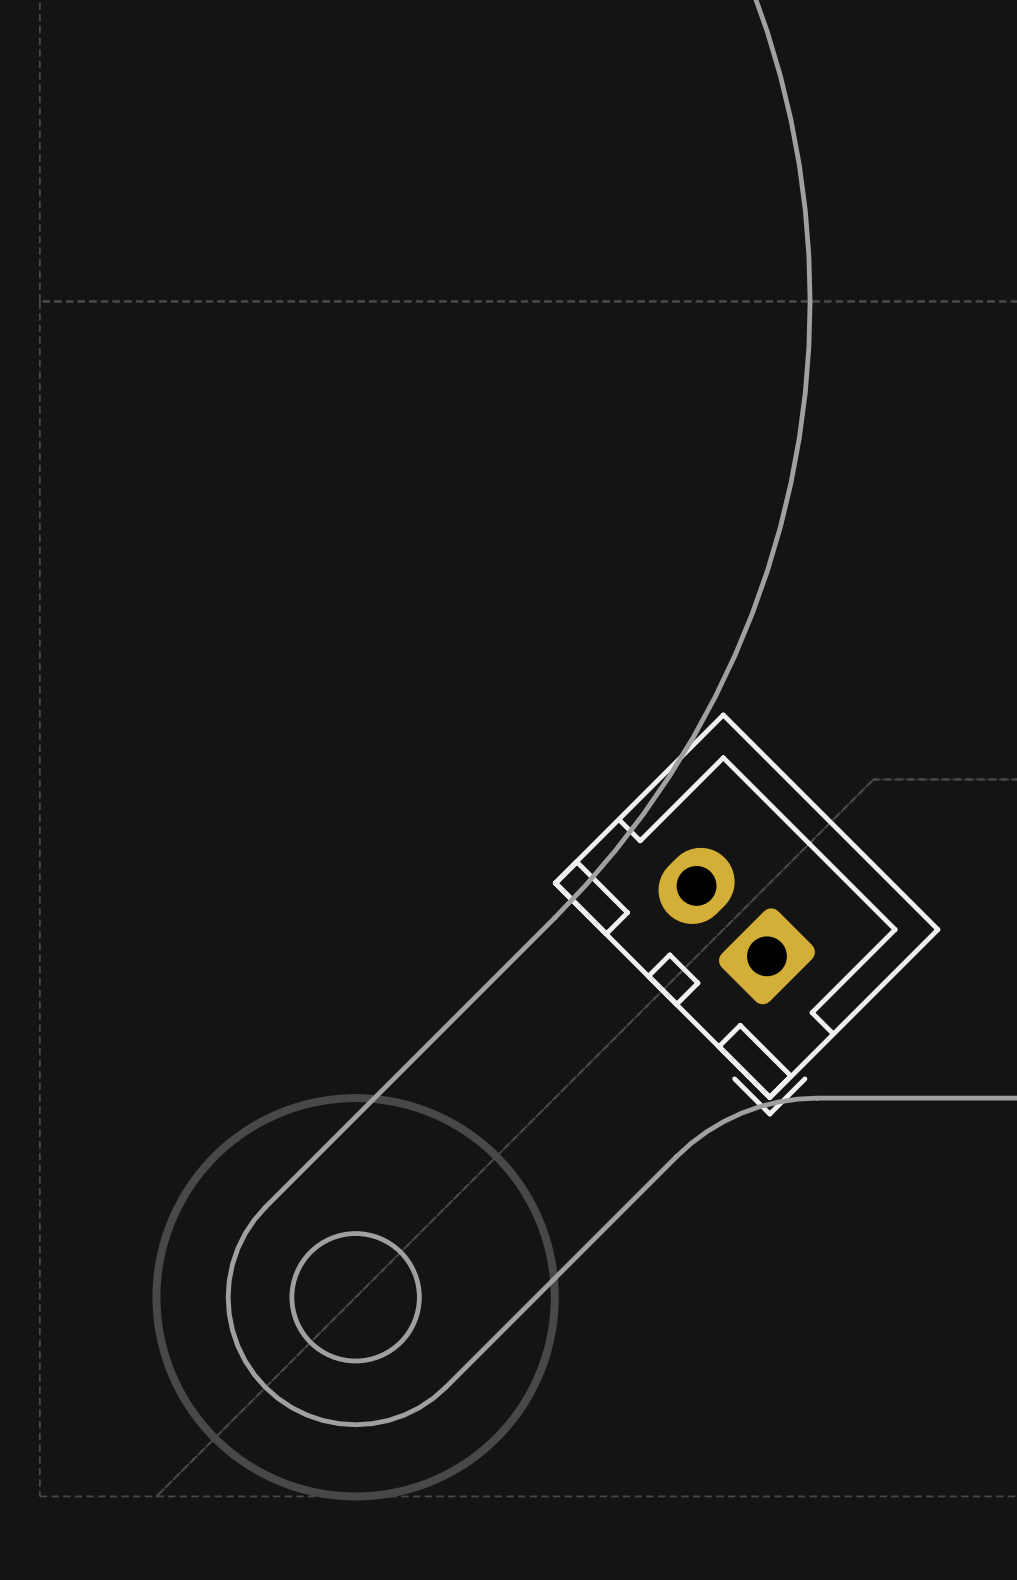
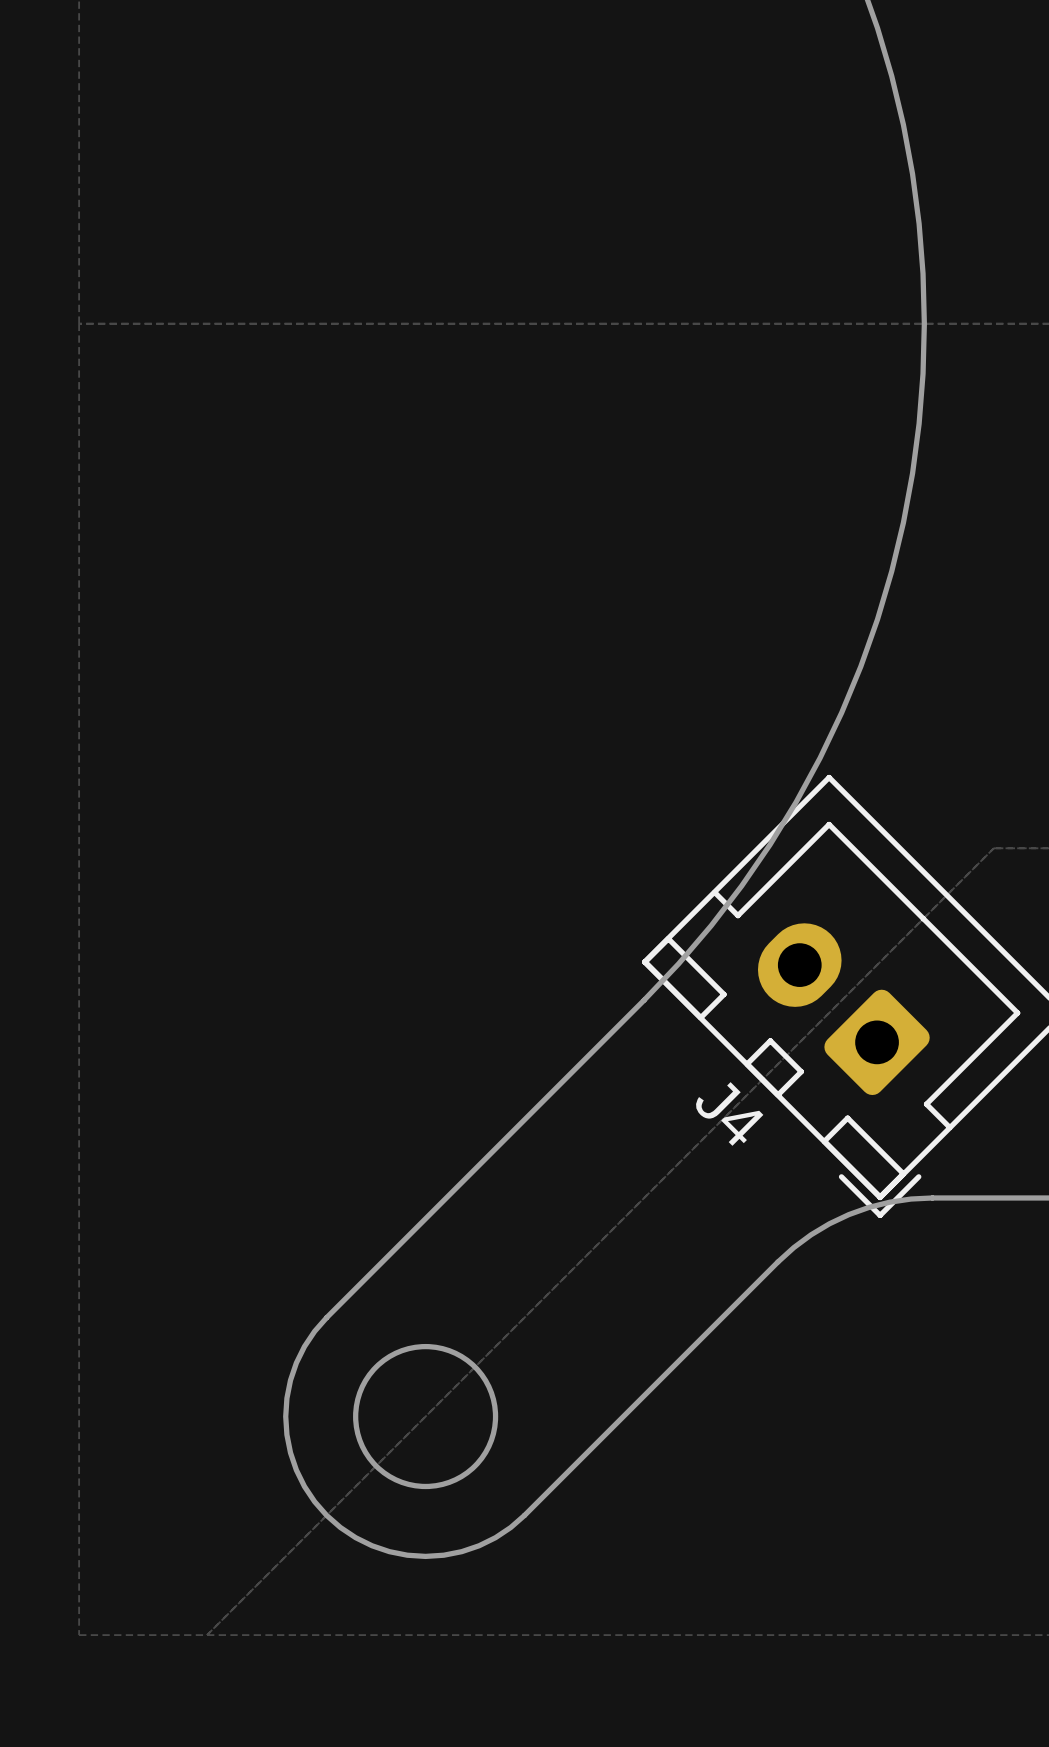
J4 name: none -> J4 (727, 1113)
drawing: [152, 1094, 559, 1501] -> none

